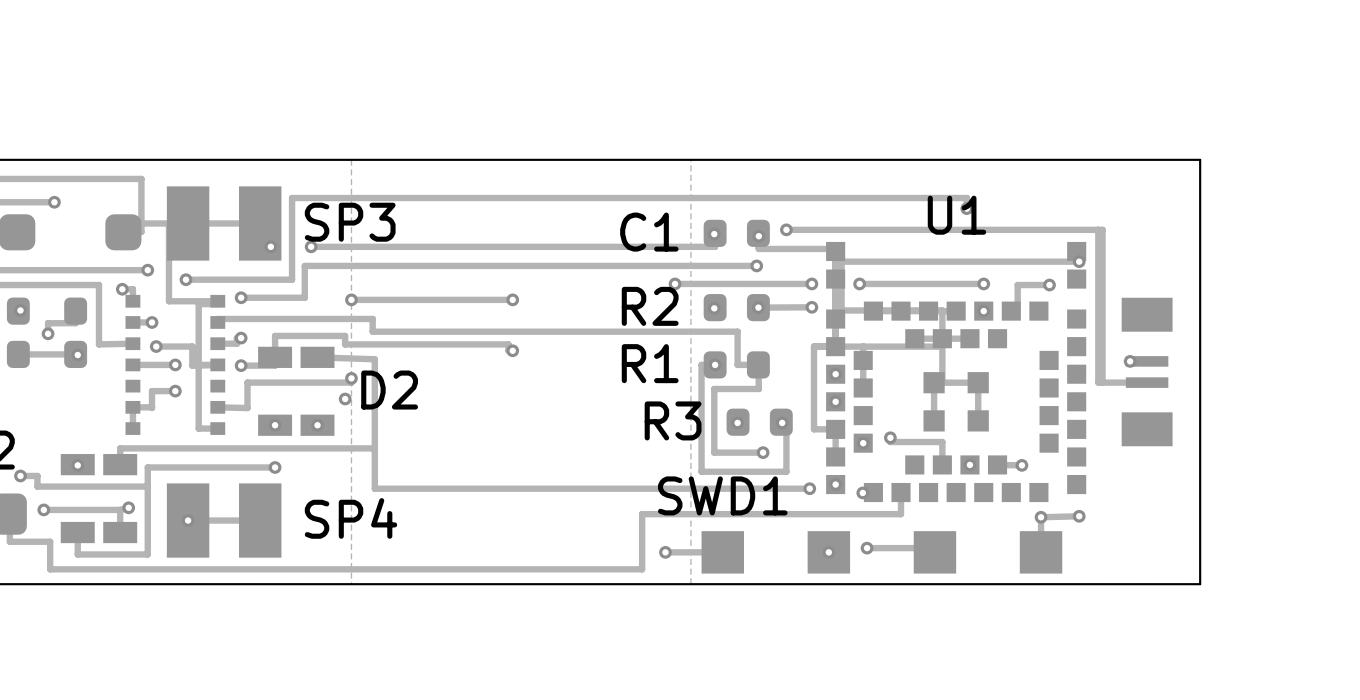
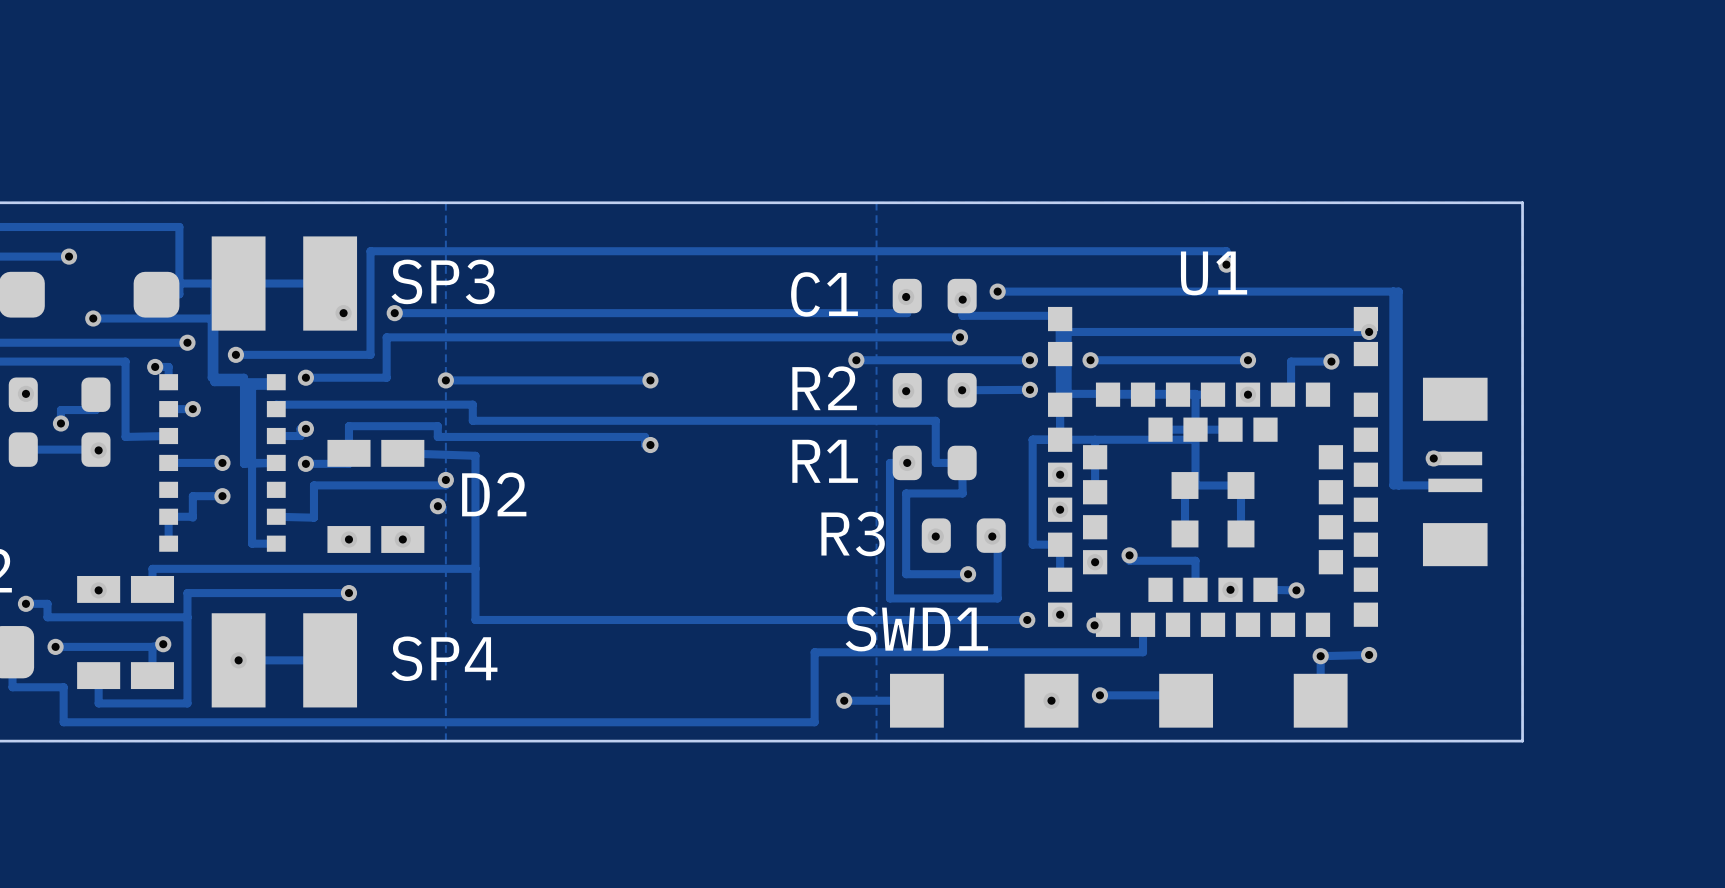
track: (156, 346) (192, 346) -> (93, 318) (211, 318) (211, 377) (244, 377) (244, 439)
via position: (156, 346) -> (93, 318)

